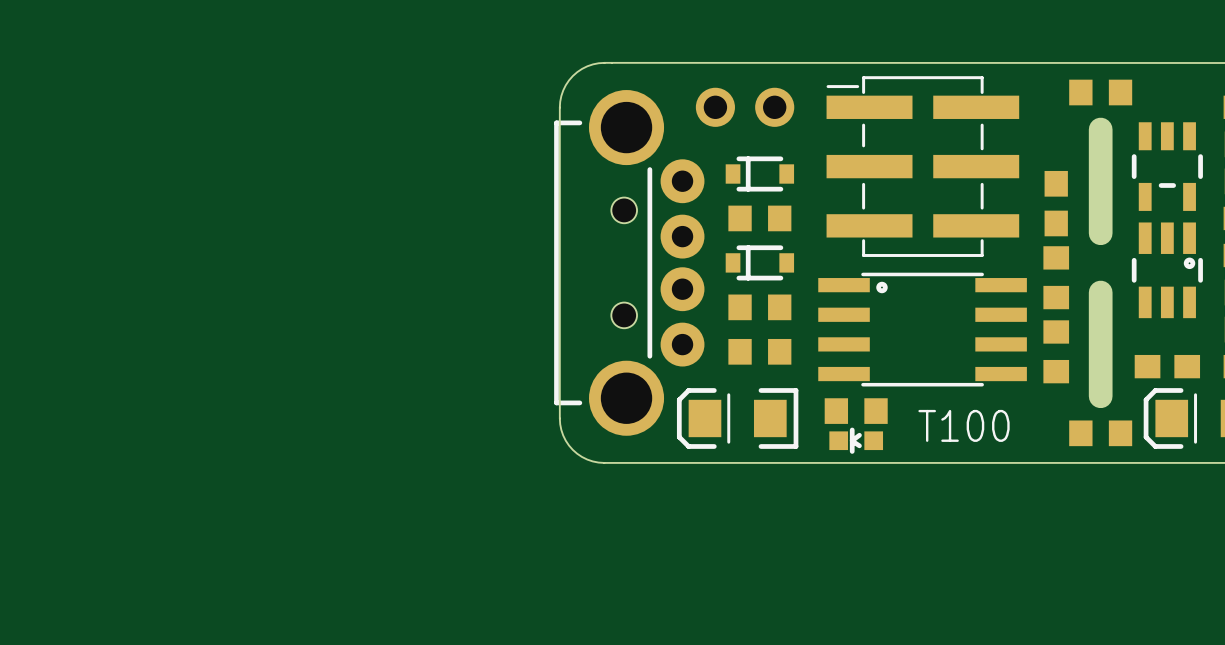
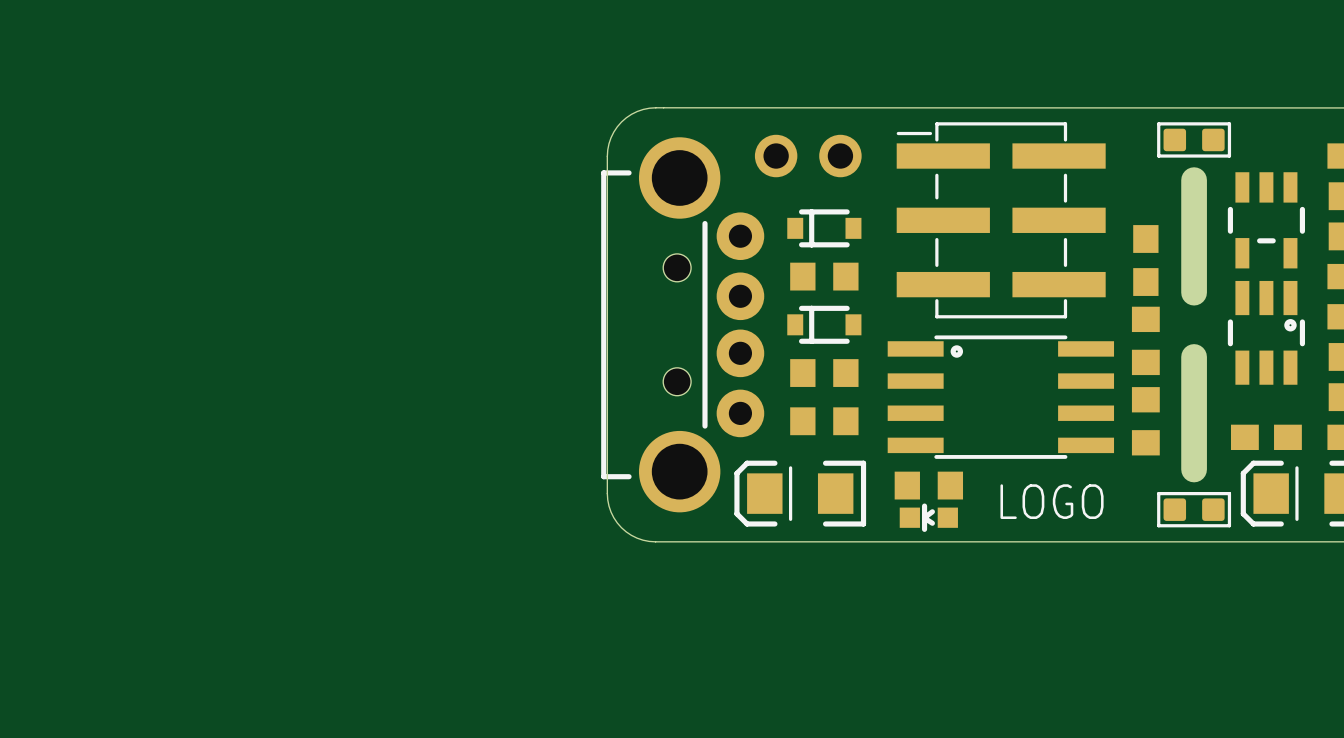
part footprint: [1069, 79, 1133, 106] -> [1157, 122, 1232, 158]
part footprint: [1069, 420, 1133, 447] -> [1157, 491, 1232, 528]
text: T100 (964, 425) -> LOGO (1052, 501)

